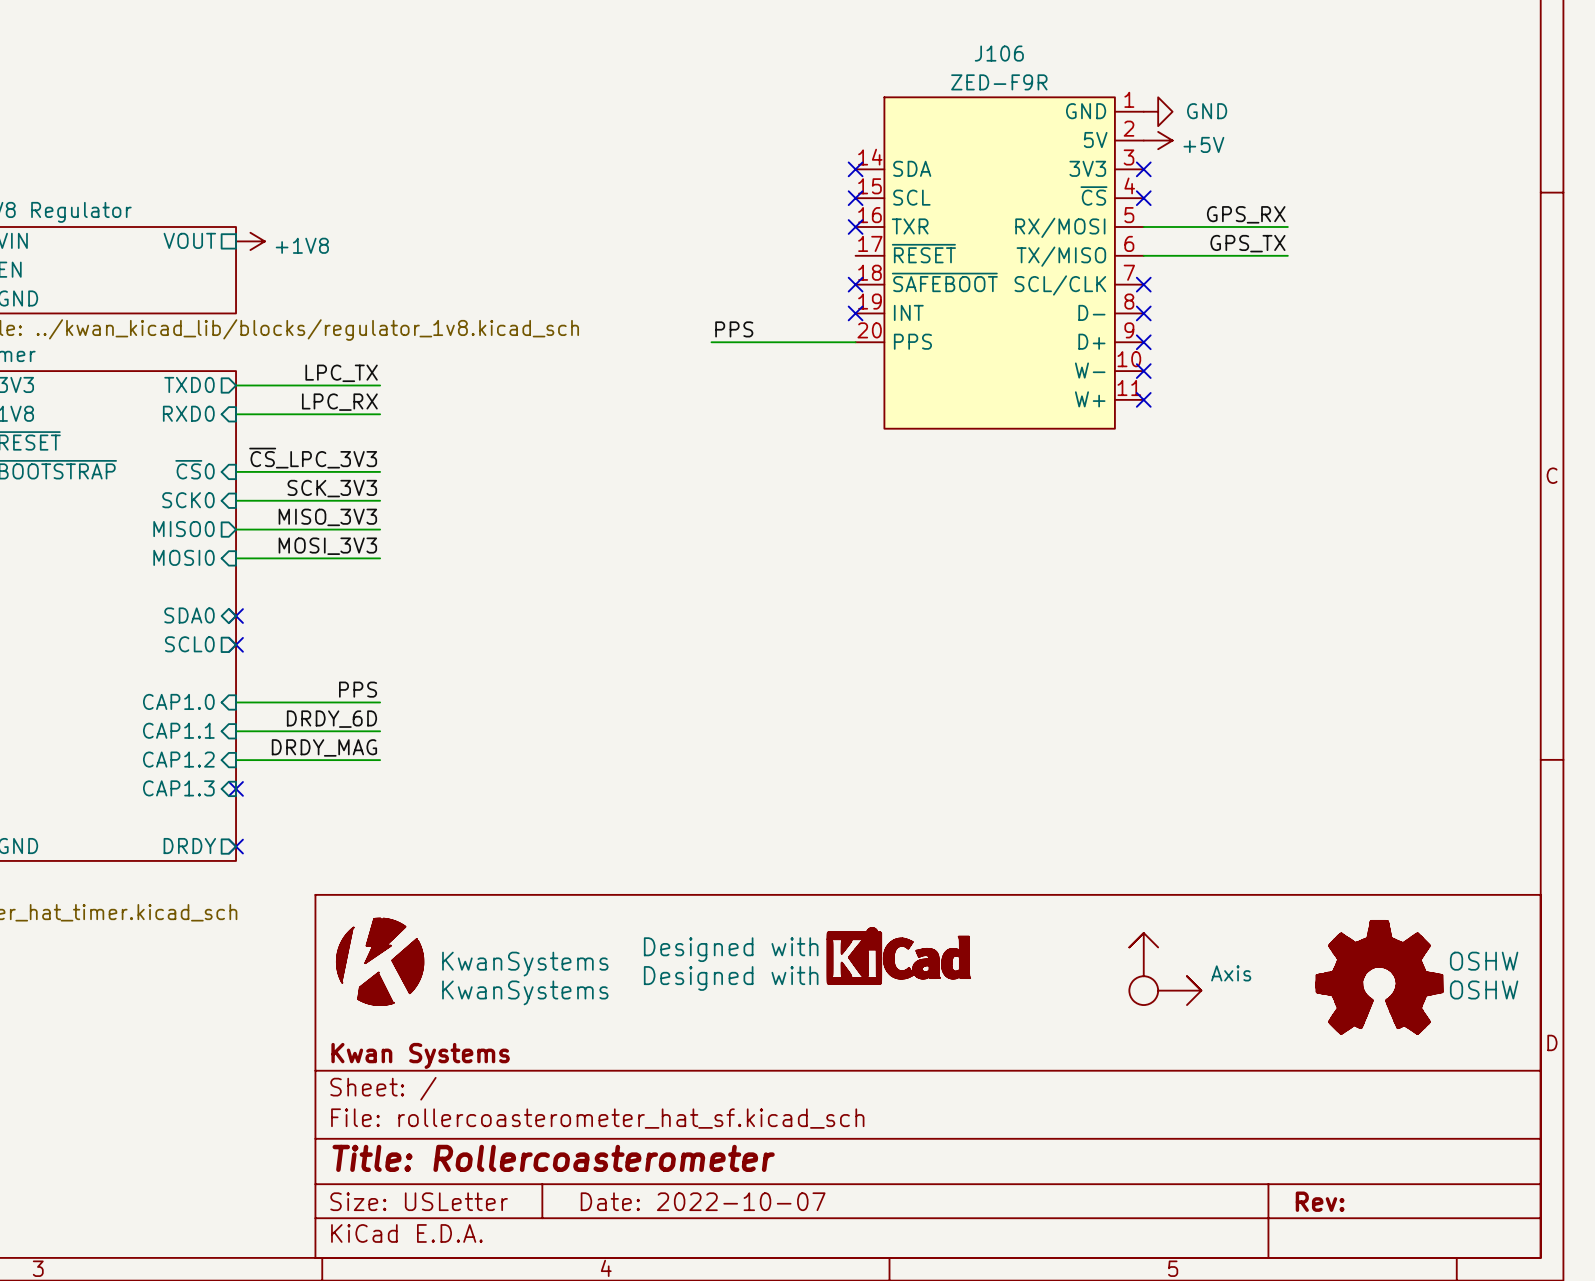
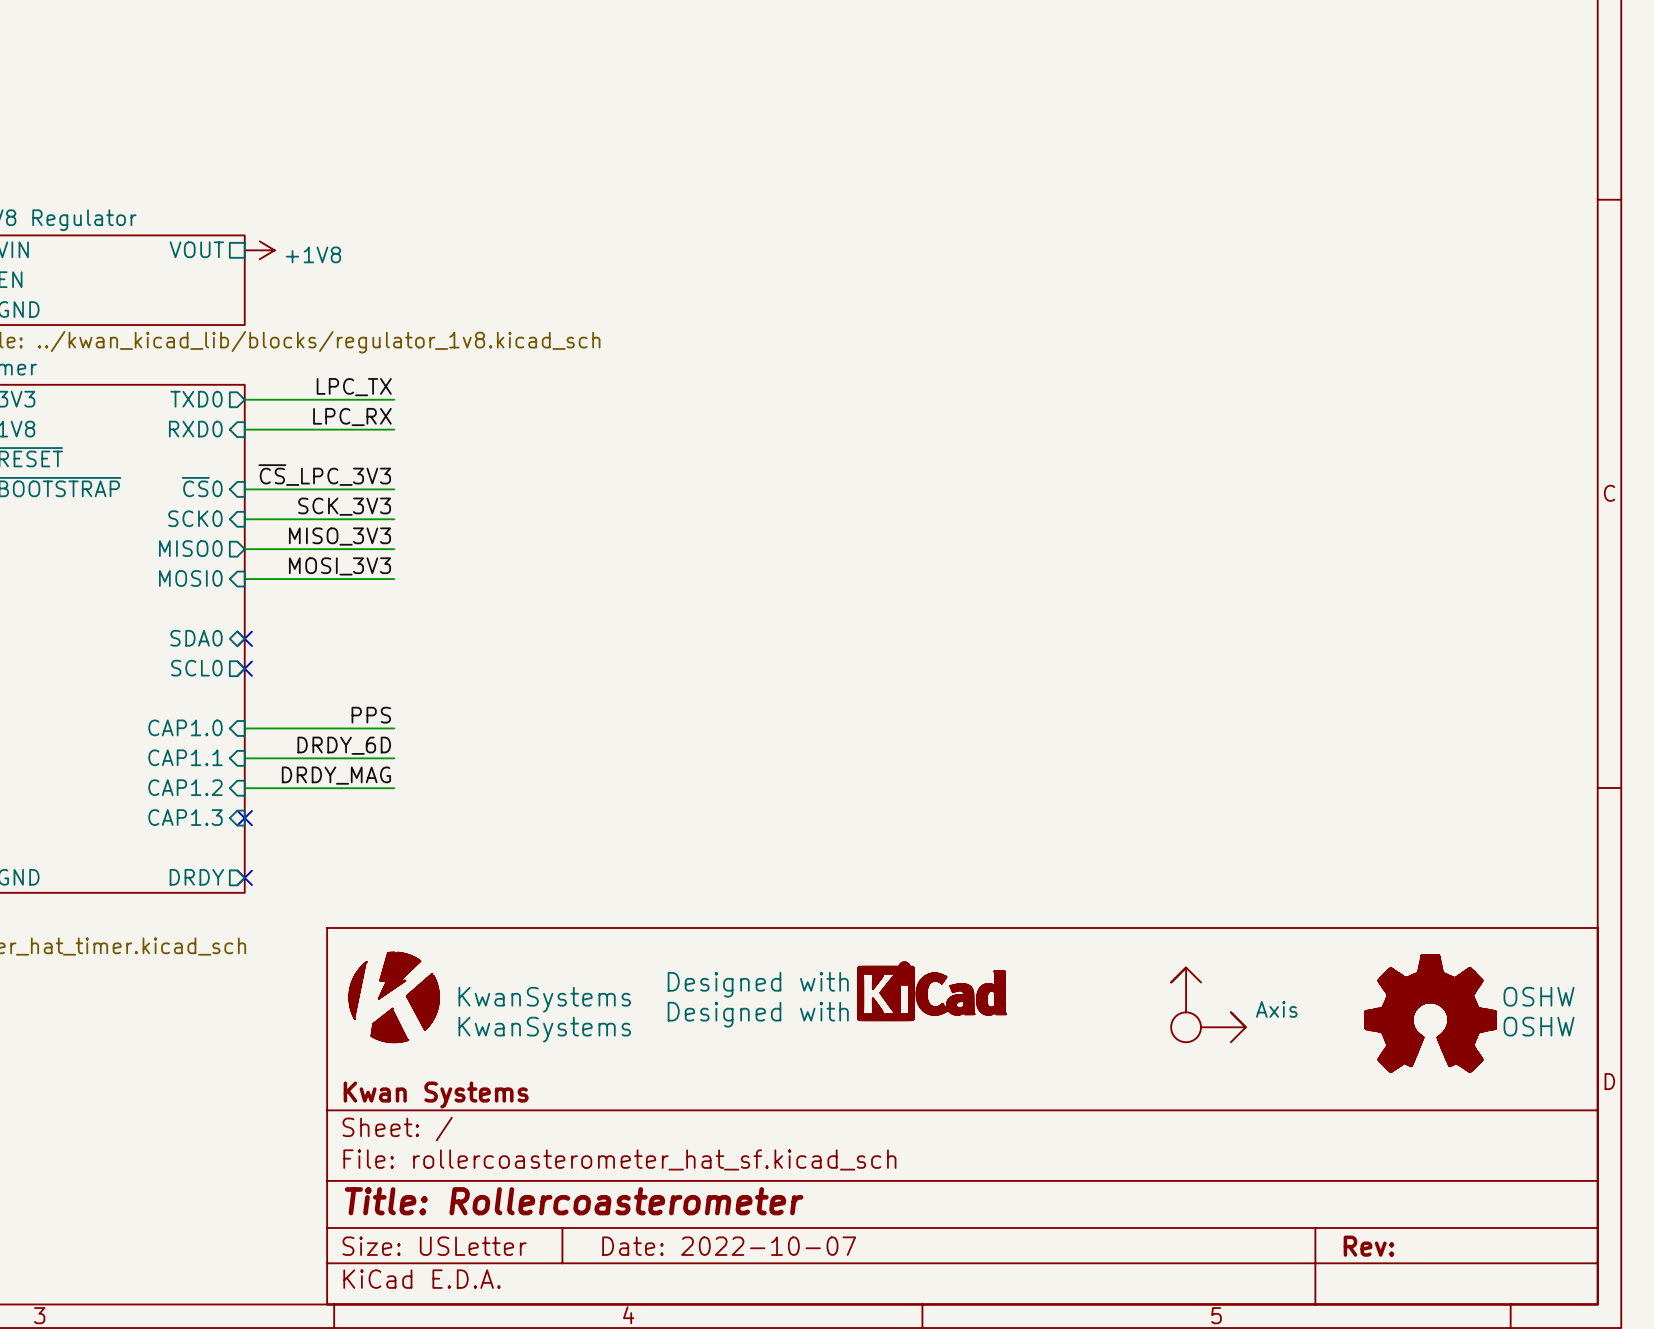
power symbol: GND (1158, 111) -> none
power symbol: +5V (1158, 140) -> none
no-connect mark: (855, 169) -> none
no-connect mark: (1143, 169) -> none
no-connect mark: (855, 198) -> none
no-connect mark: (1143, 198) -> none
label: GPS_RX (1246, 214) -> none
no-connect mark: (855, 226) -> none
wire: (1143, 226) (1287, 226) -> none
label: GPS_TX (1247, 243) -> none
wire: (1143, 255) (1287, 255) -> none
J106: ZED-F9R (999, 263) -> none
no-connect mark: (855, 284) -> none
no-connect mark: (1143, 284) -> none
no-connect mark: (855, 313) -> none
no-connect mark: (1143, 313) -> none
label: PPS (734, 329) -> none
wire: (711, 342) (855, 342) -> none
no-connect mark: (1143, 342) -> none
no-connect mark: (1143, 371) -> none
no-connect mark: (1143, 399) -> none

